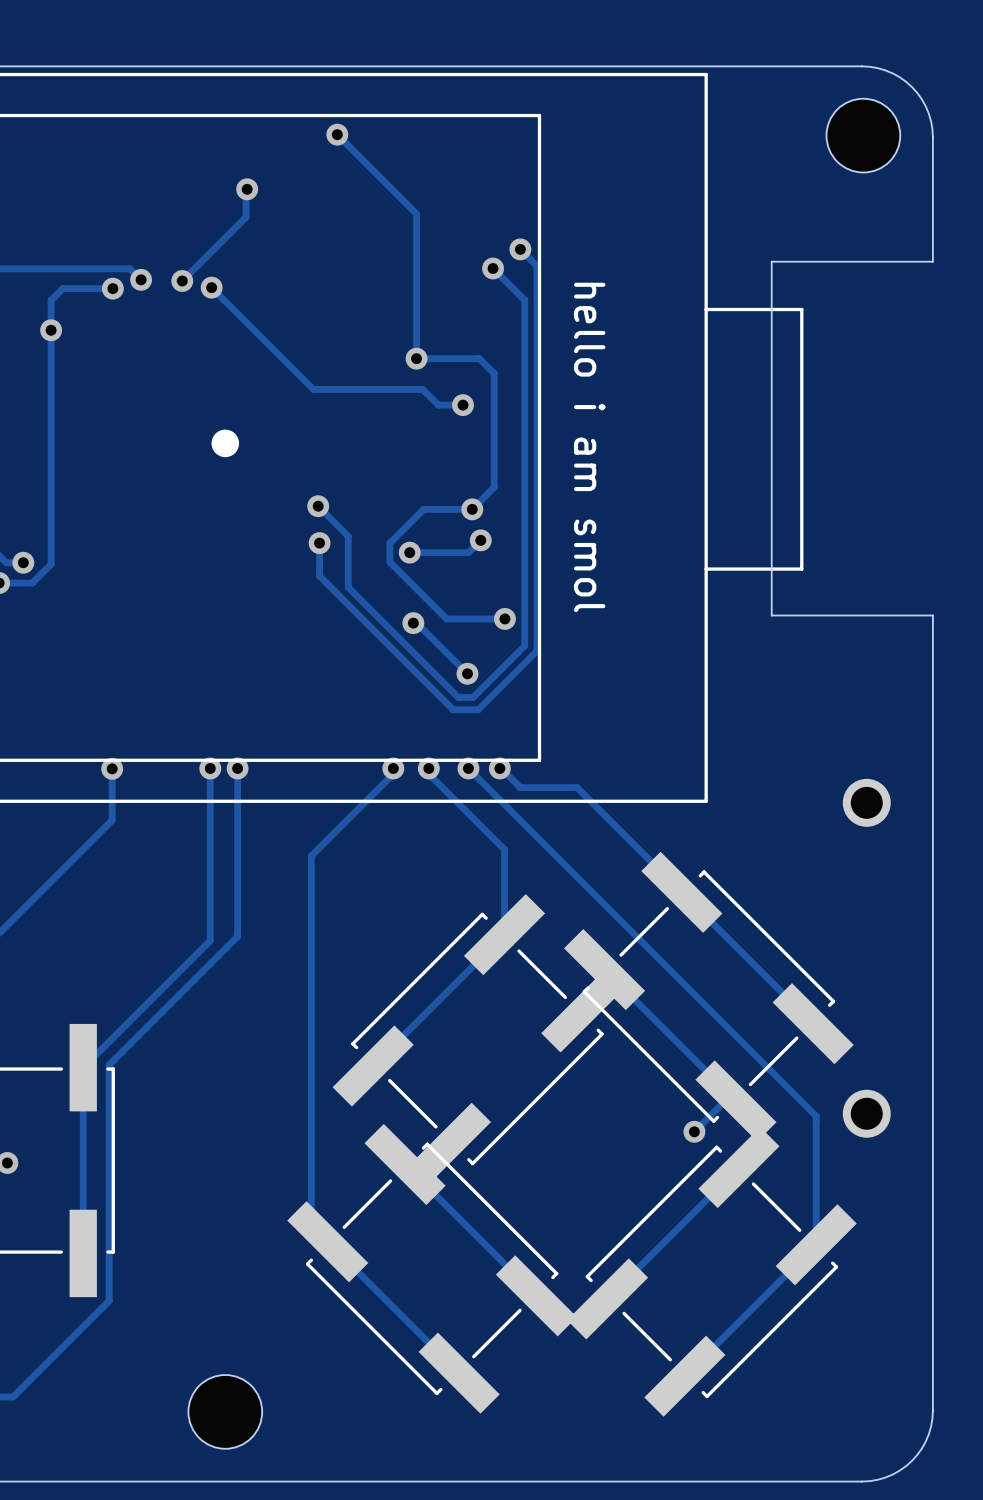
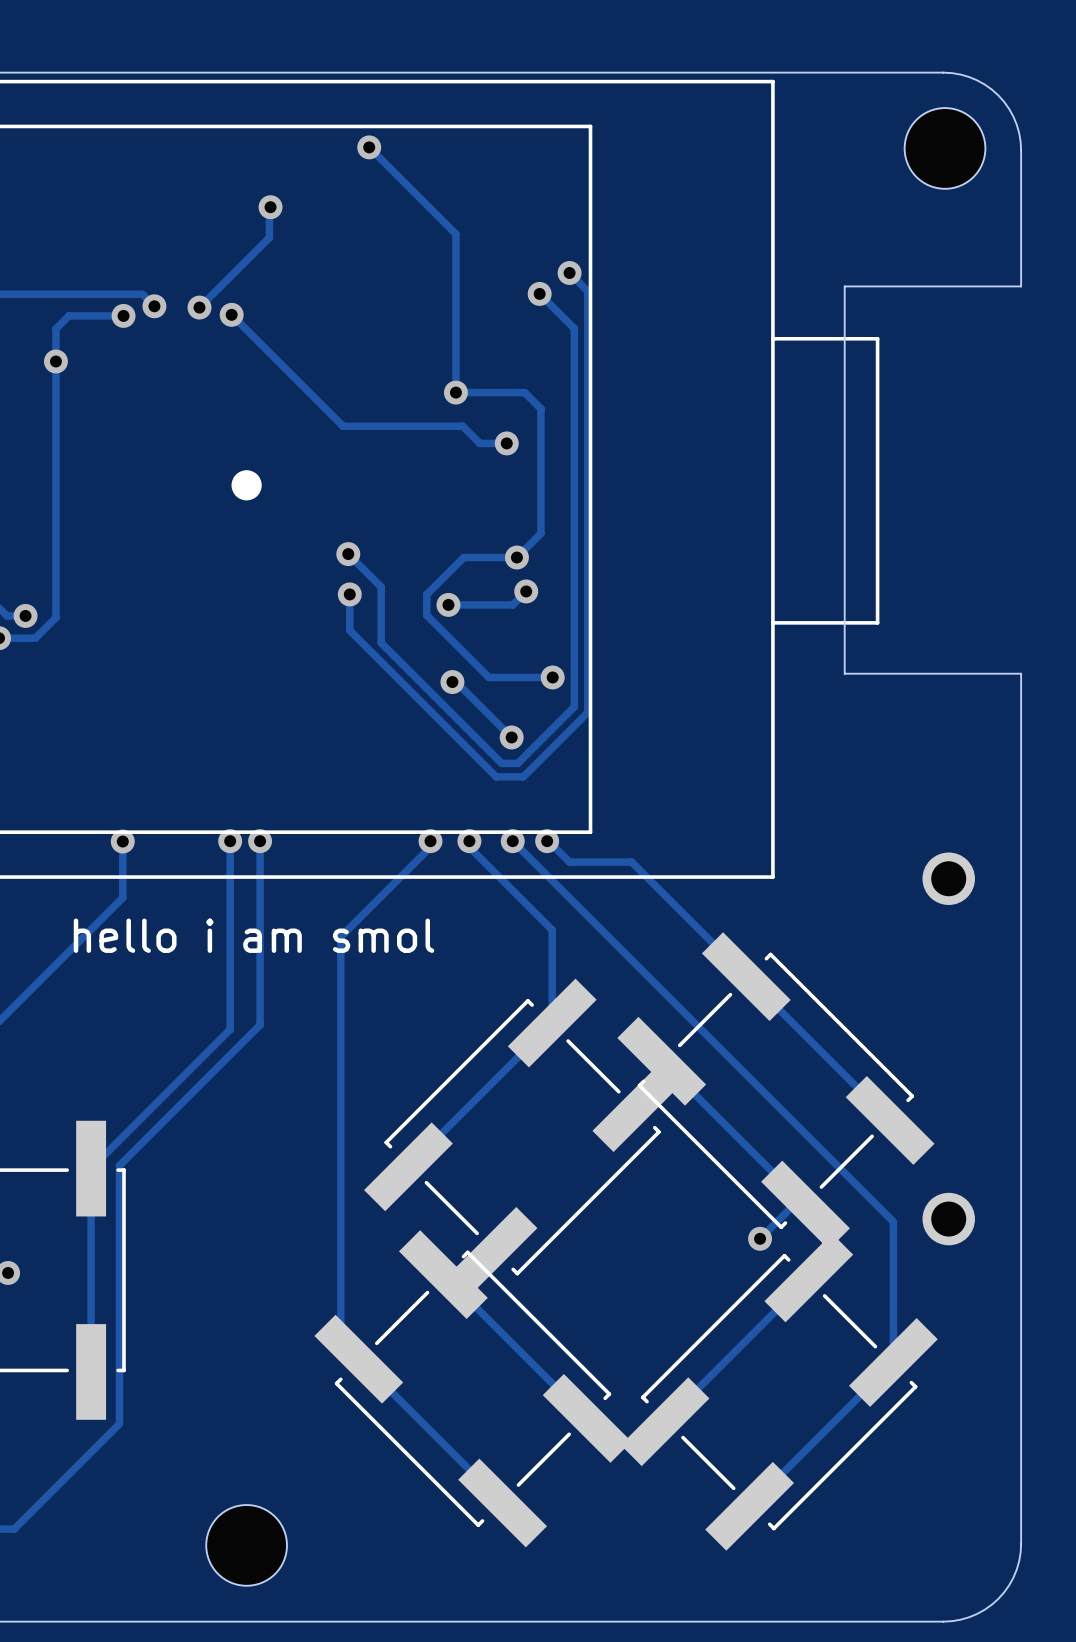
hello i am smol name rotation: 0° (589, 447) -> 90° counterclockwise (254, 935)
hello i am smol name position: hello i am smol (589, 447) -> hello i am smol (254, 935)

